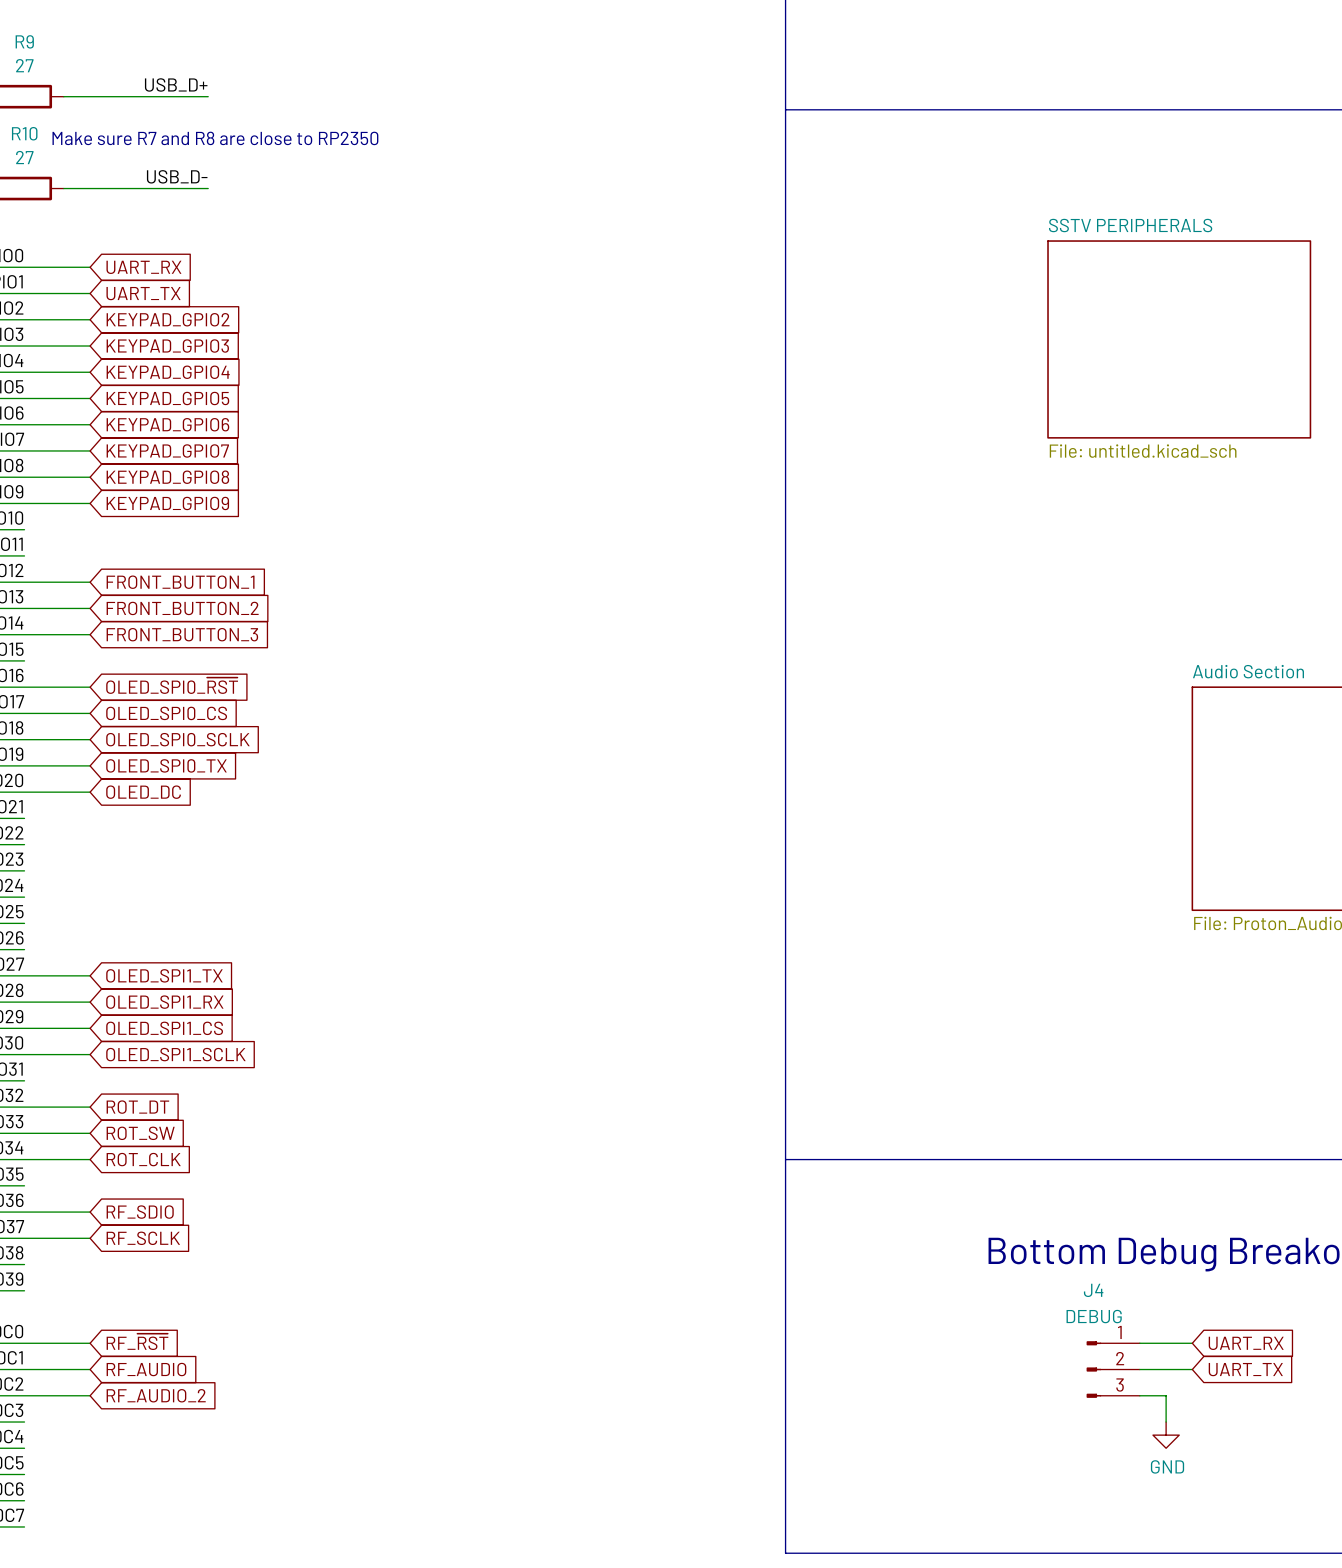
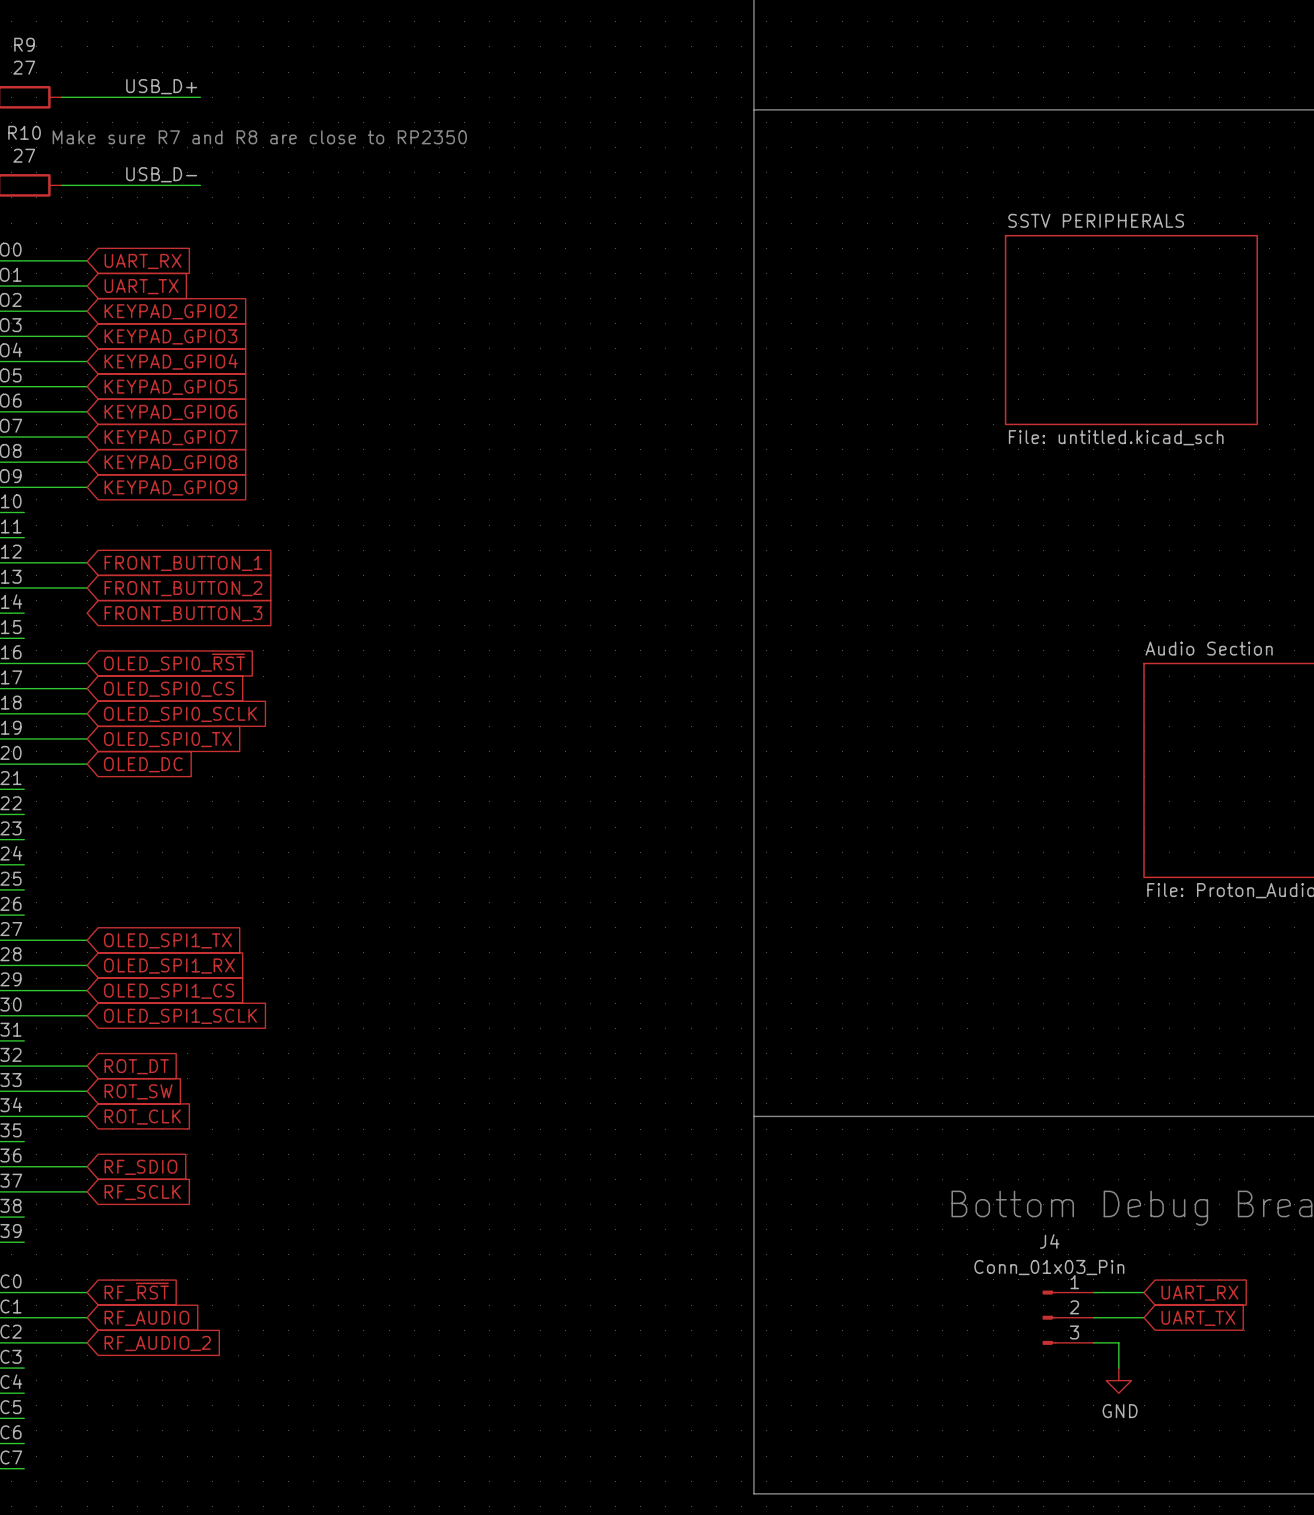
wire: (24, 634) (90, 634) -> none
J4 value: DEBUG (1094, 1316) -> Conn_01x03_Pin (1049, 1267)

